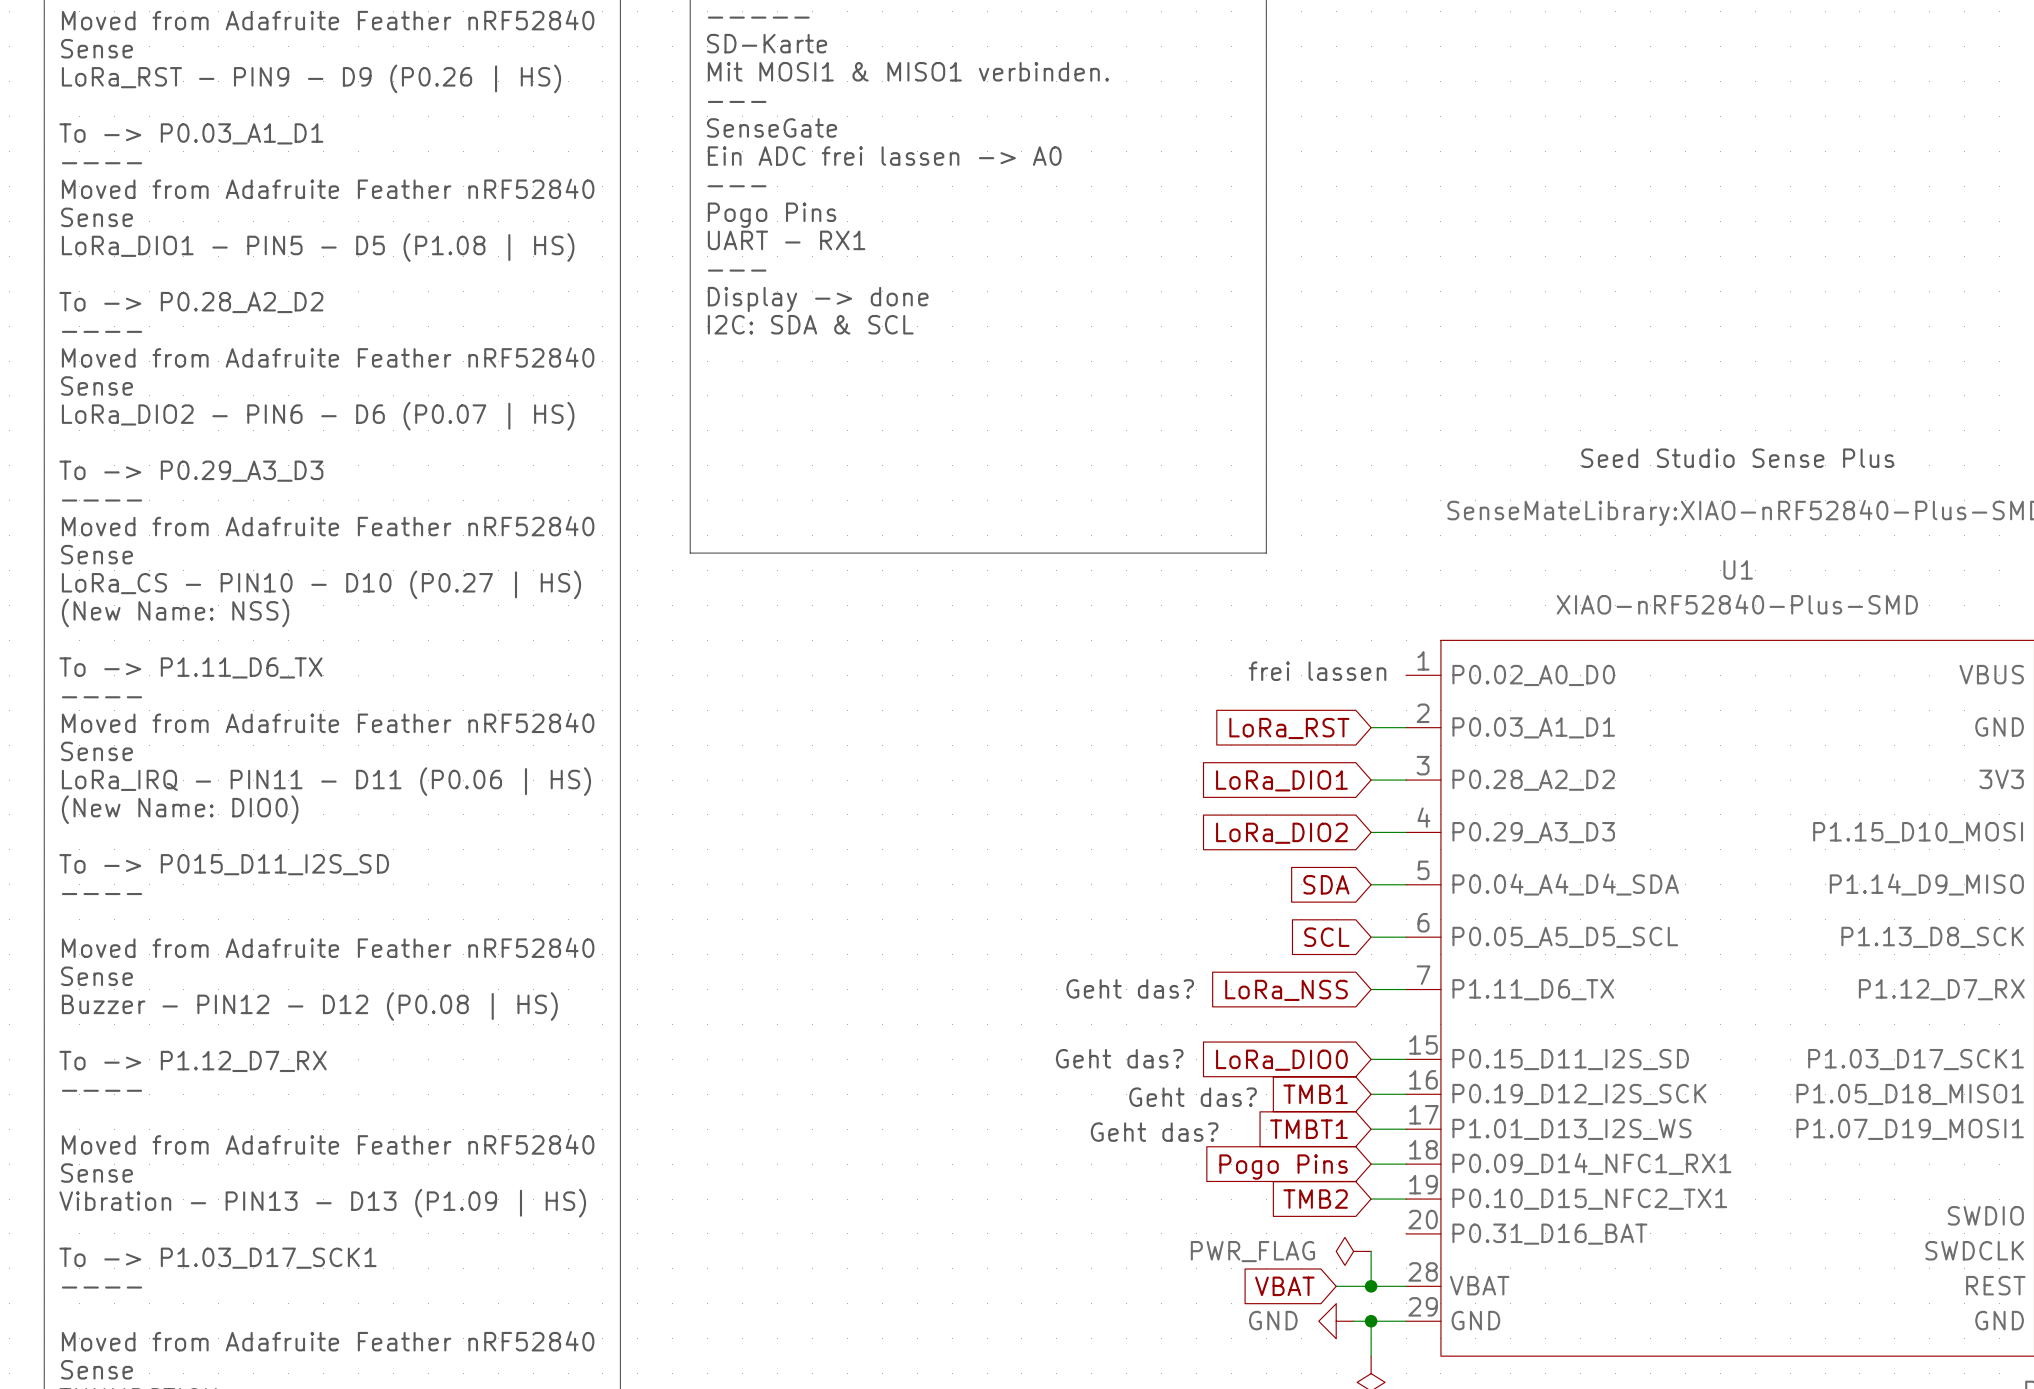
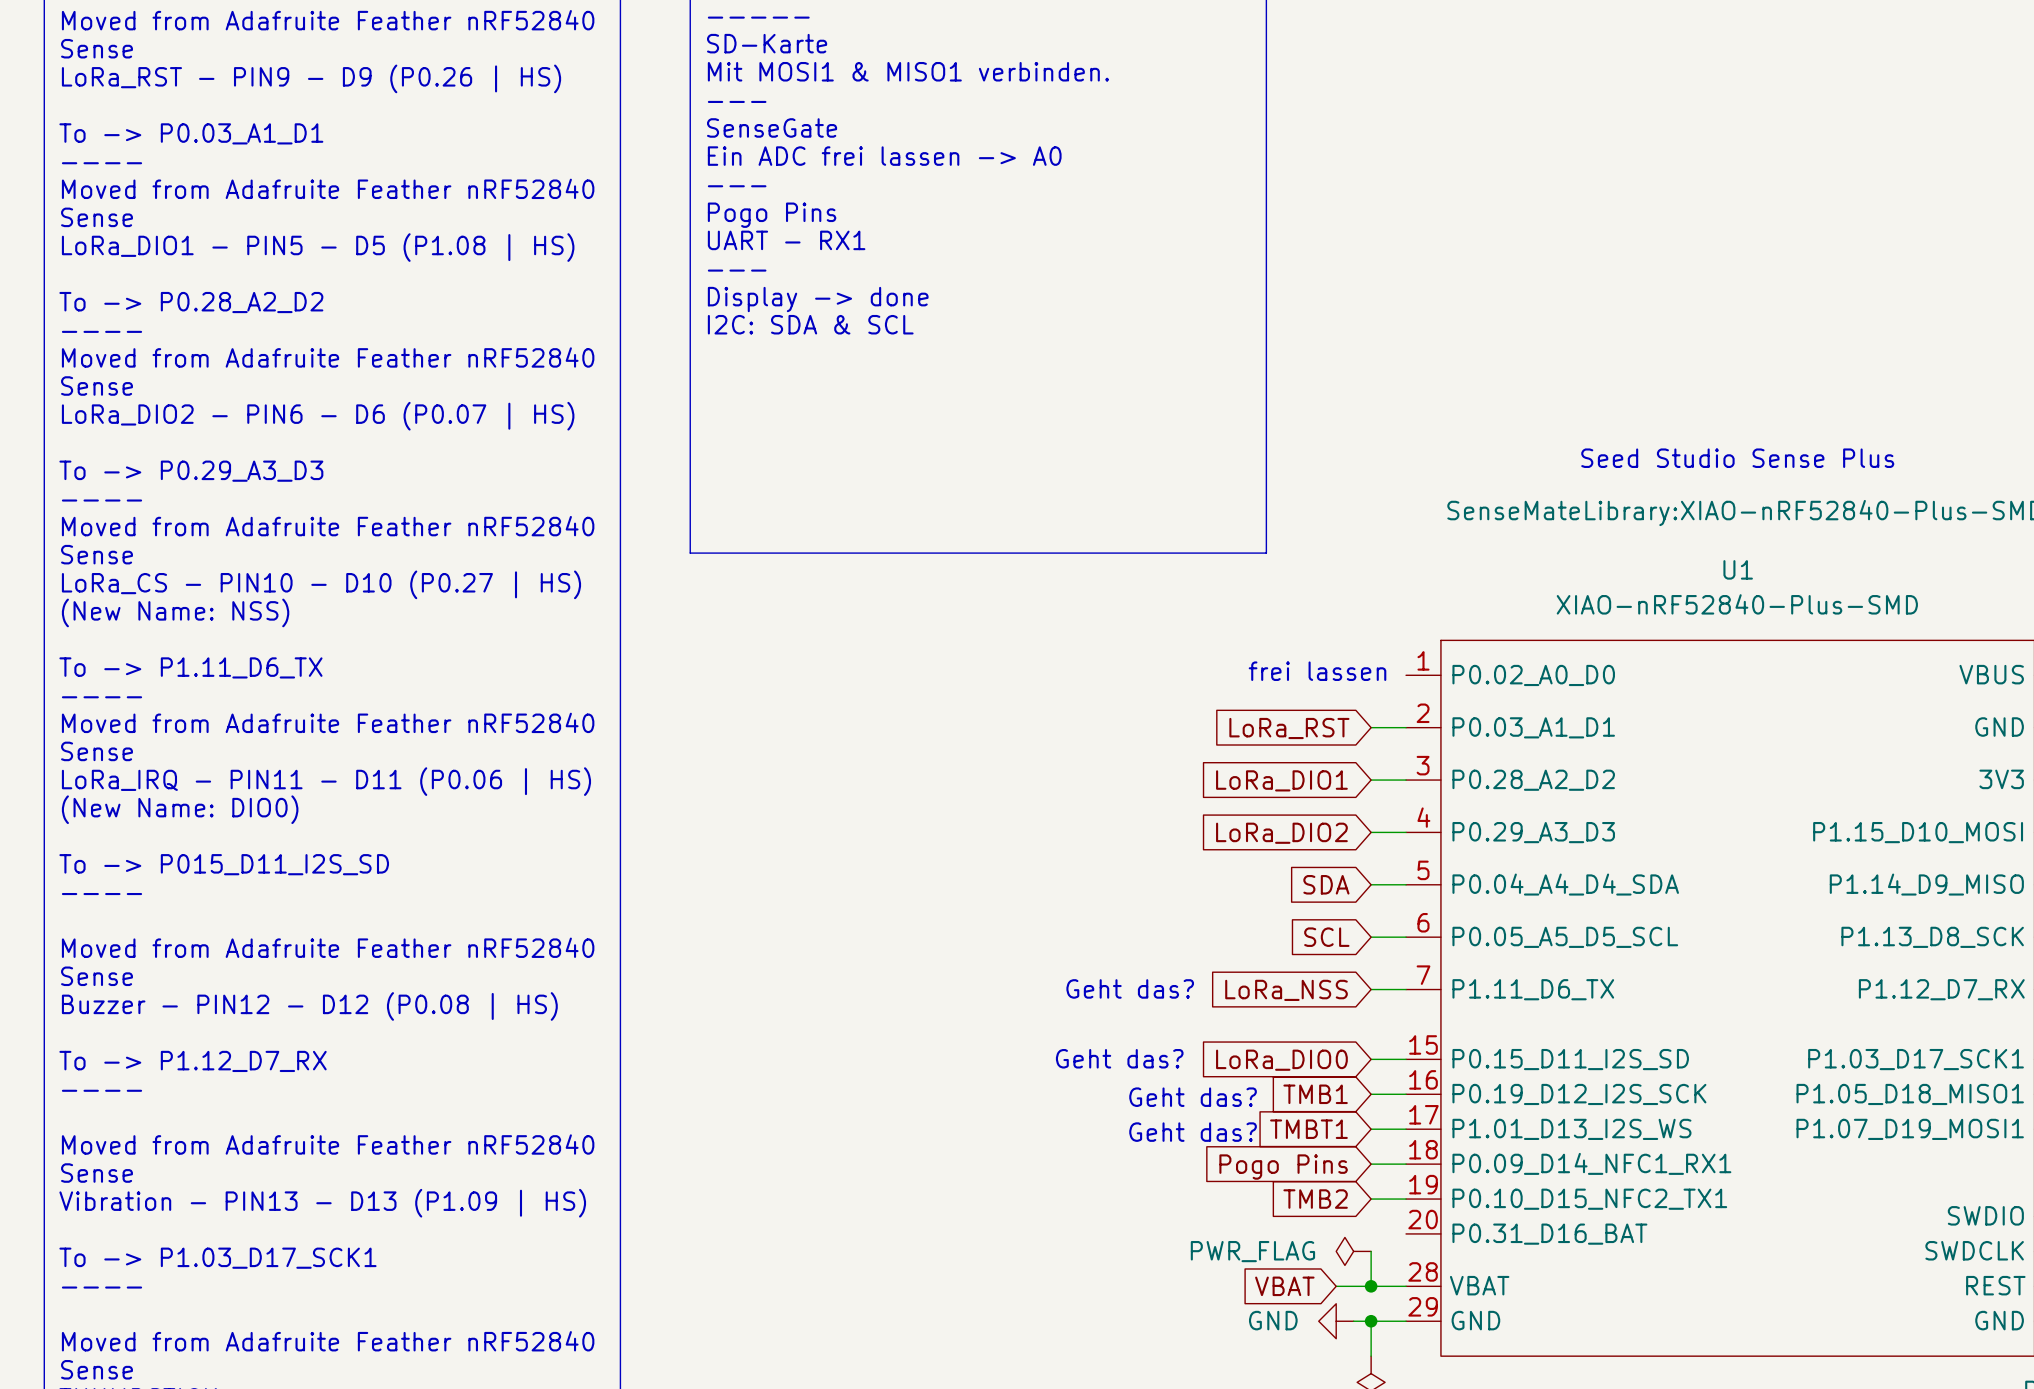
text position: Geht das? (1154, 1132) -> Geht das? (1193, 1132)

